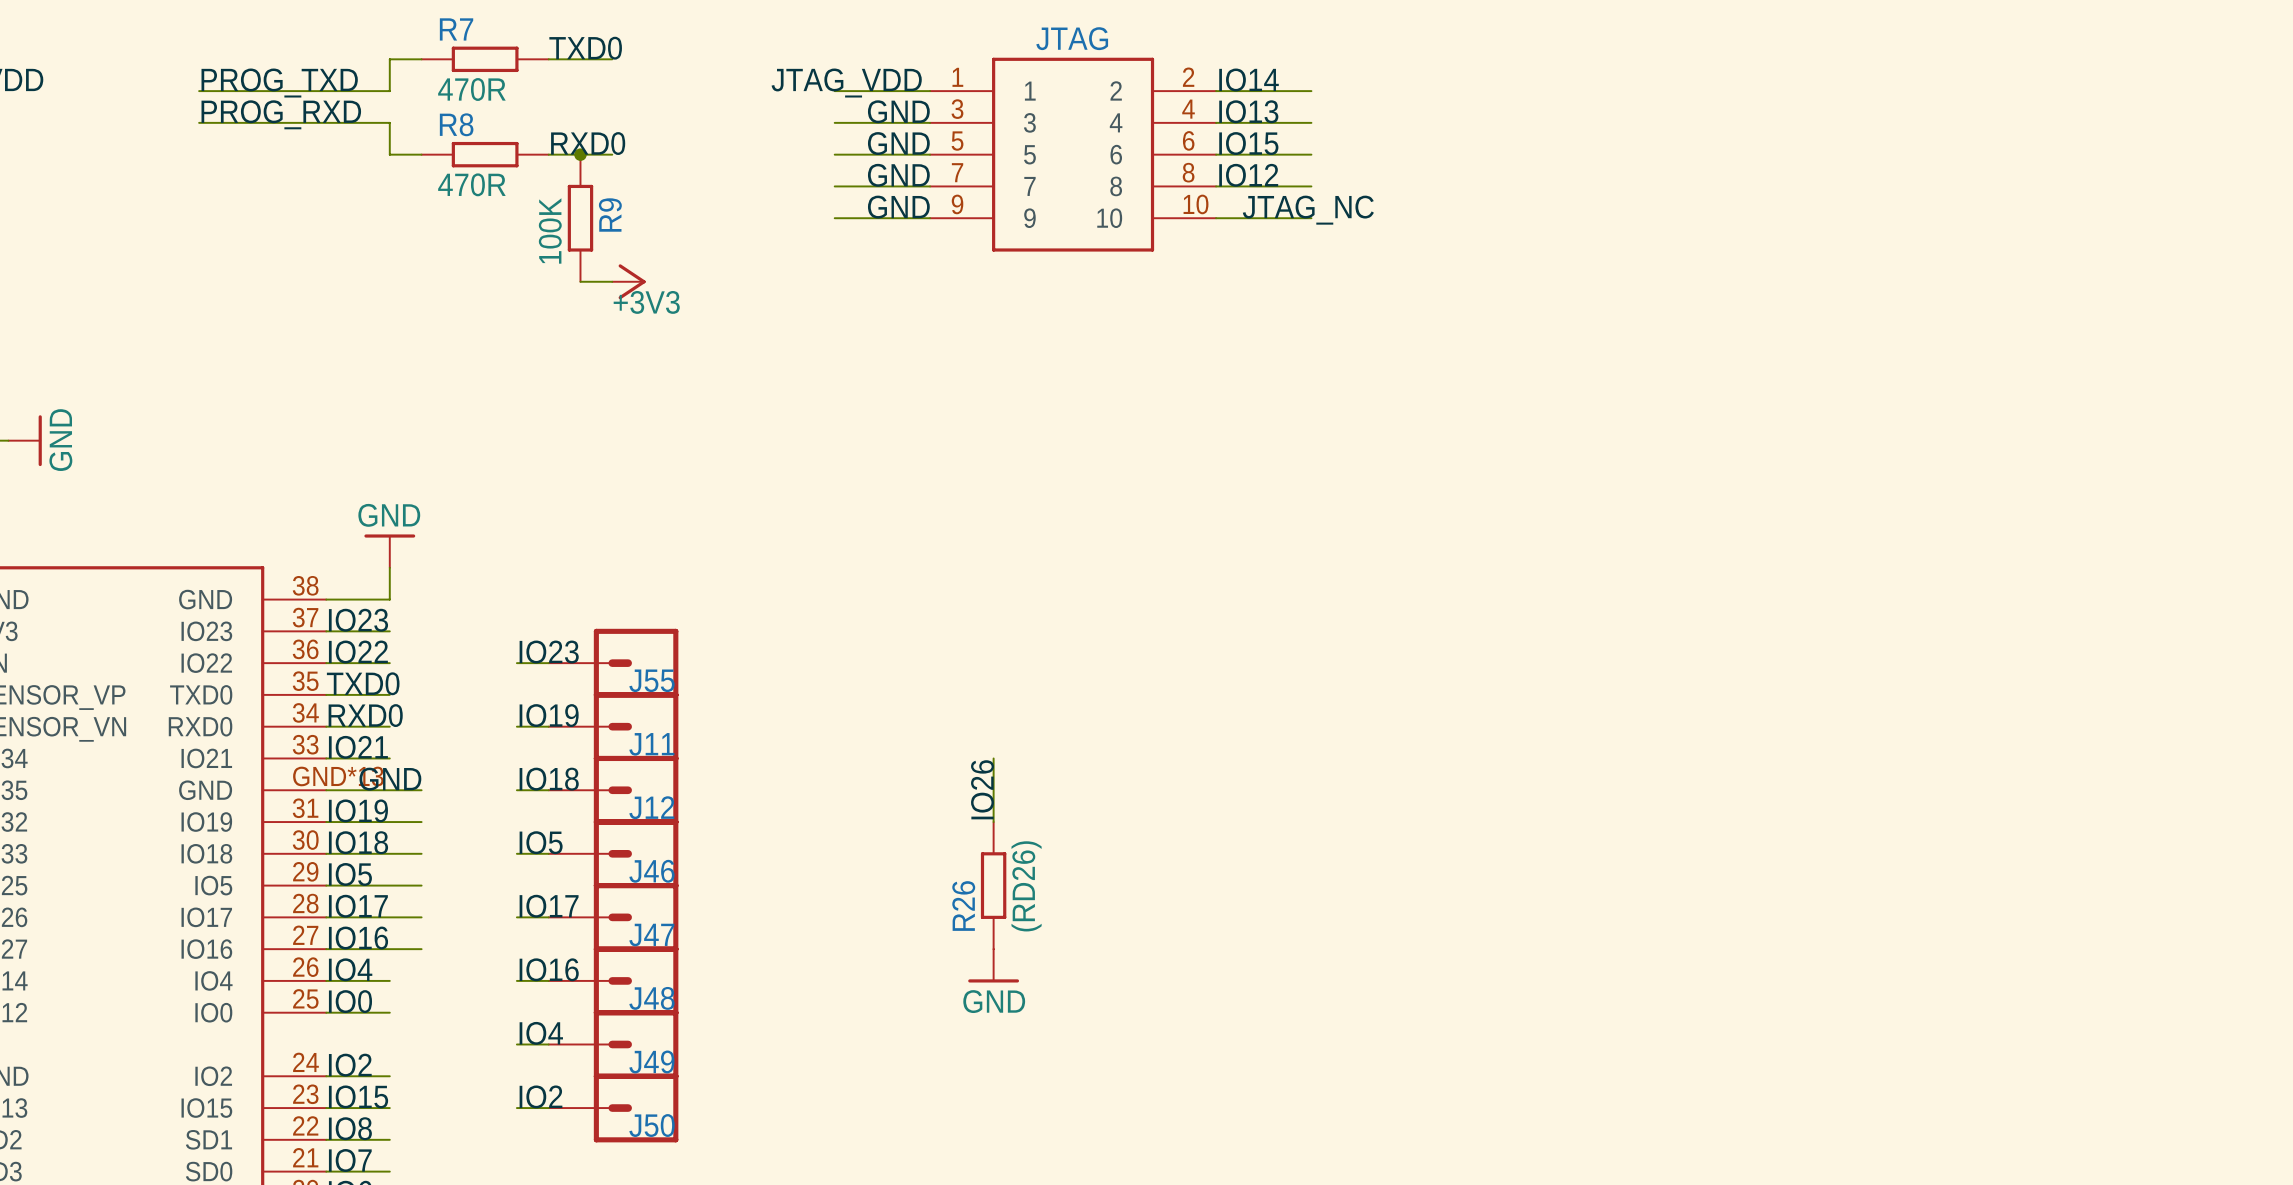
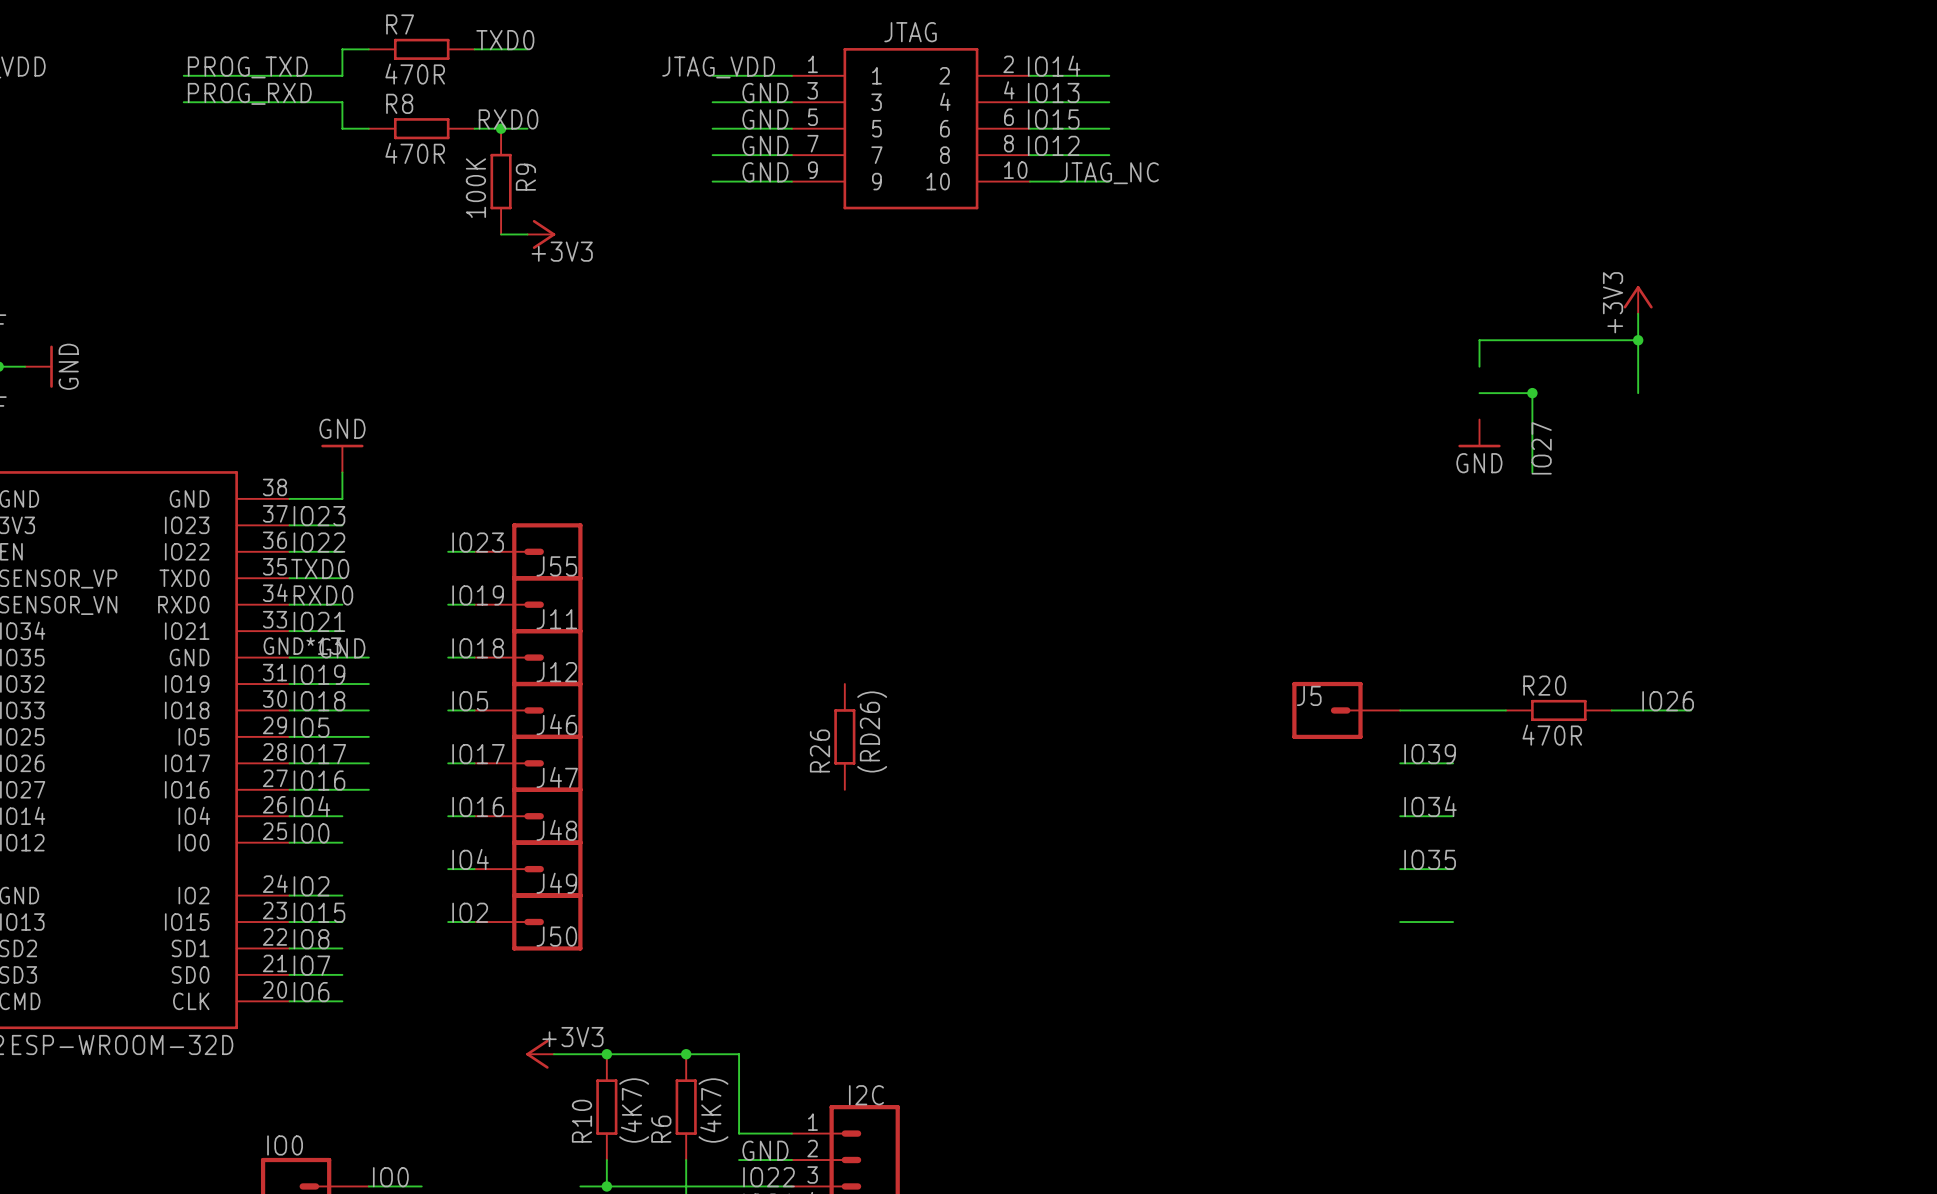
power symbol: none -> +3V3 (1638, 299)
wire: none -> (1638, 313) (1638, 393)
wire: none -> (1638, 340) (1479, 340) (1479, 366)
junction: none -> (1638, 340)
wire: none -> (1479, 393) (1532, 393) (1532, 472)
junction: none -> (1532, 393)
power symbol: none -> GND (1479, 433)
label: none -> IO27 (1541, 448)
wire: (993, 758) (993, 822) -> none
label: IO26 (982, 789) -> none
label: none -> IO26 (1668, 701)
J5: none -> (1346, 710)
wire: none -> (1400, 710) (1505, 710)
R20: none -> 470R (1558, 710)
wire: none -> (1611, 710) (1691, 710)
label: none -> IO39 (1430, 754)
wire: none -> (1400, 763) (1453, 763)
power symbol: GND (993, 965) -> none
label: none -> IO34 (1430, 806)
wire: none -> (1400, 816) (1453, 816)
label: none -> IO35 (1430, 859)
wire: none -> (1400, 869) (1453, 869)
wire: none -> (1400, 922) (1453, 922)

